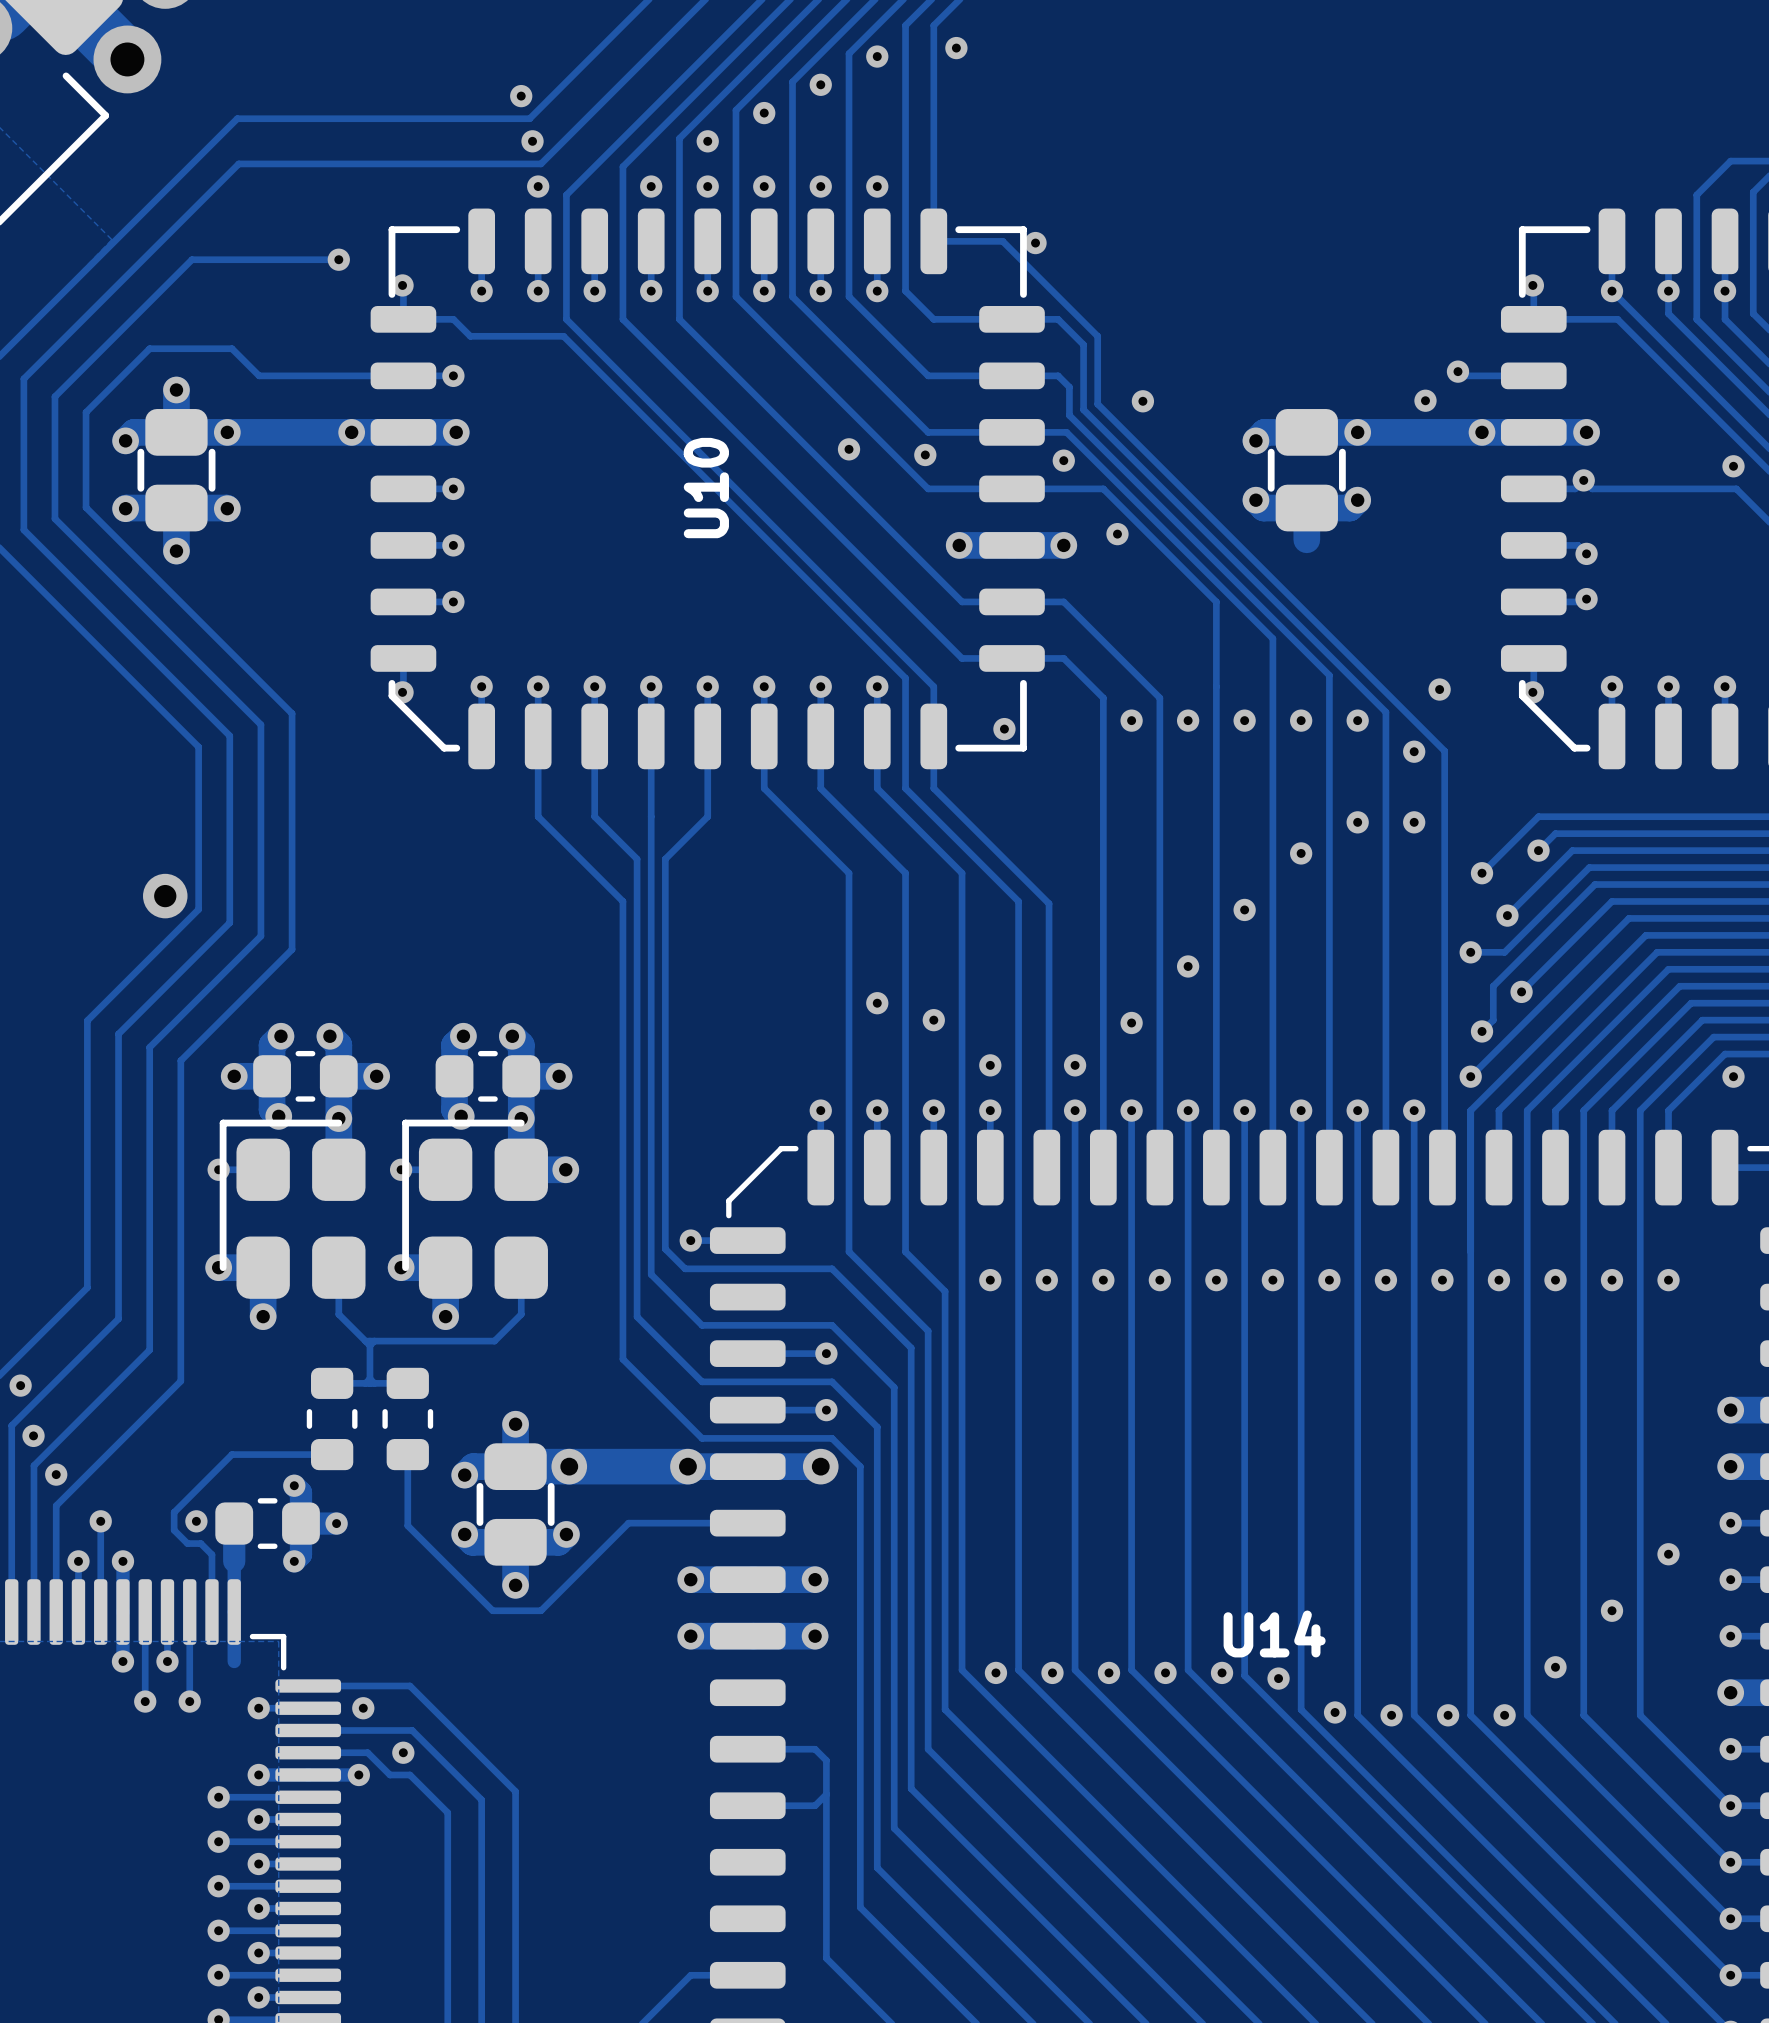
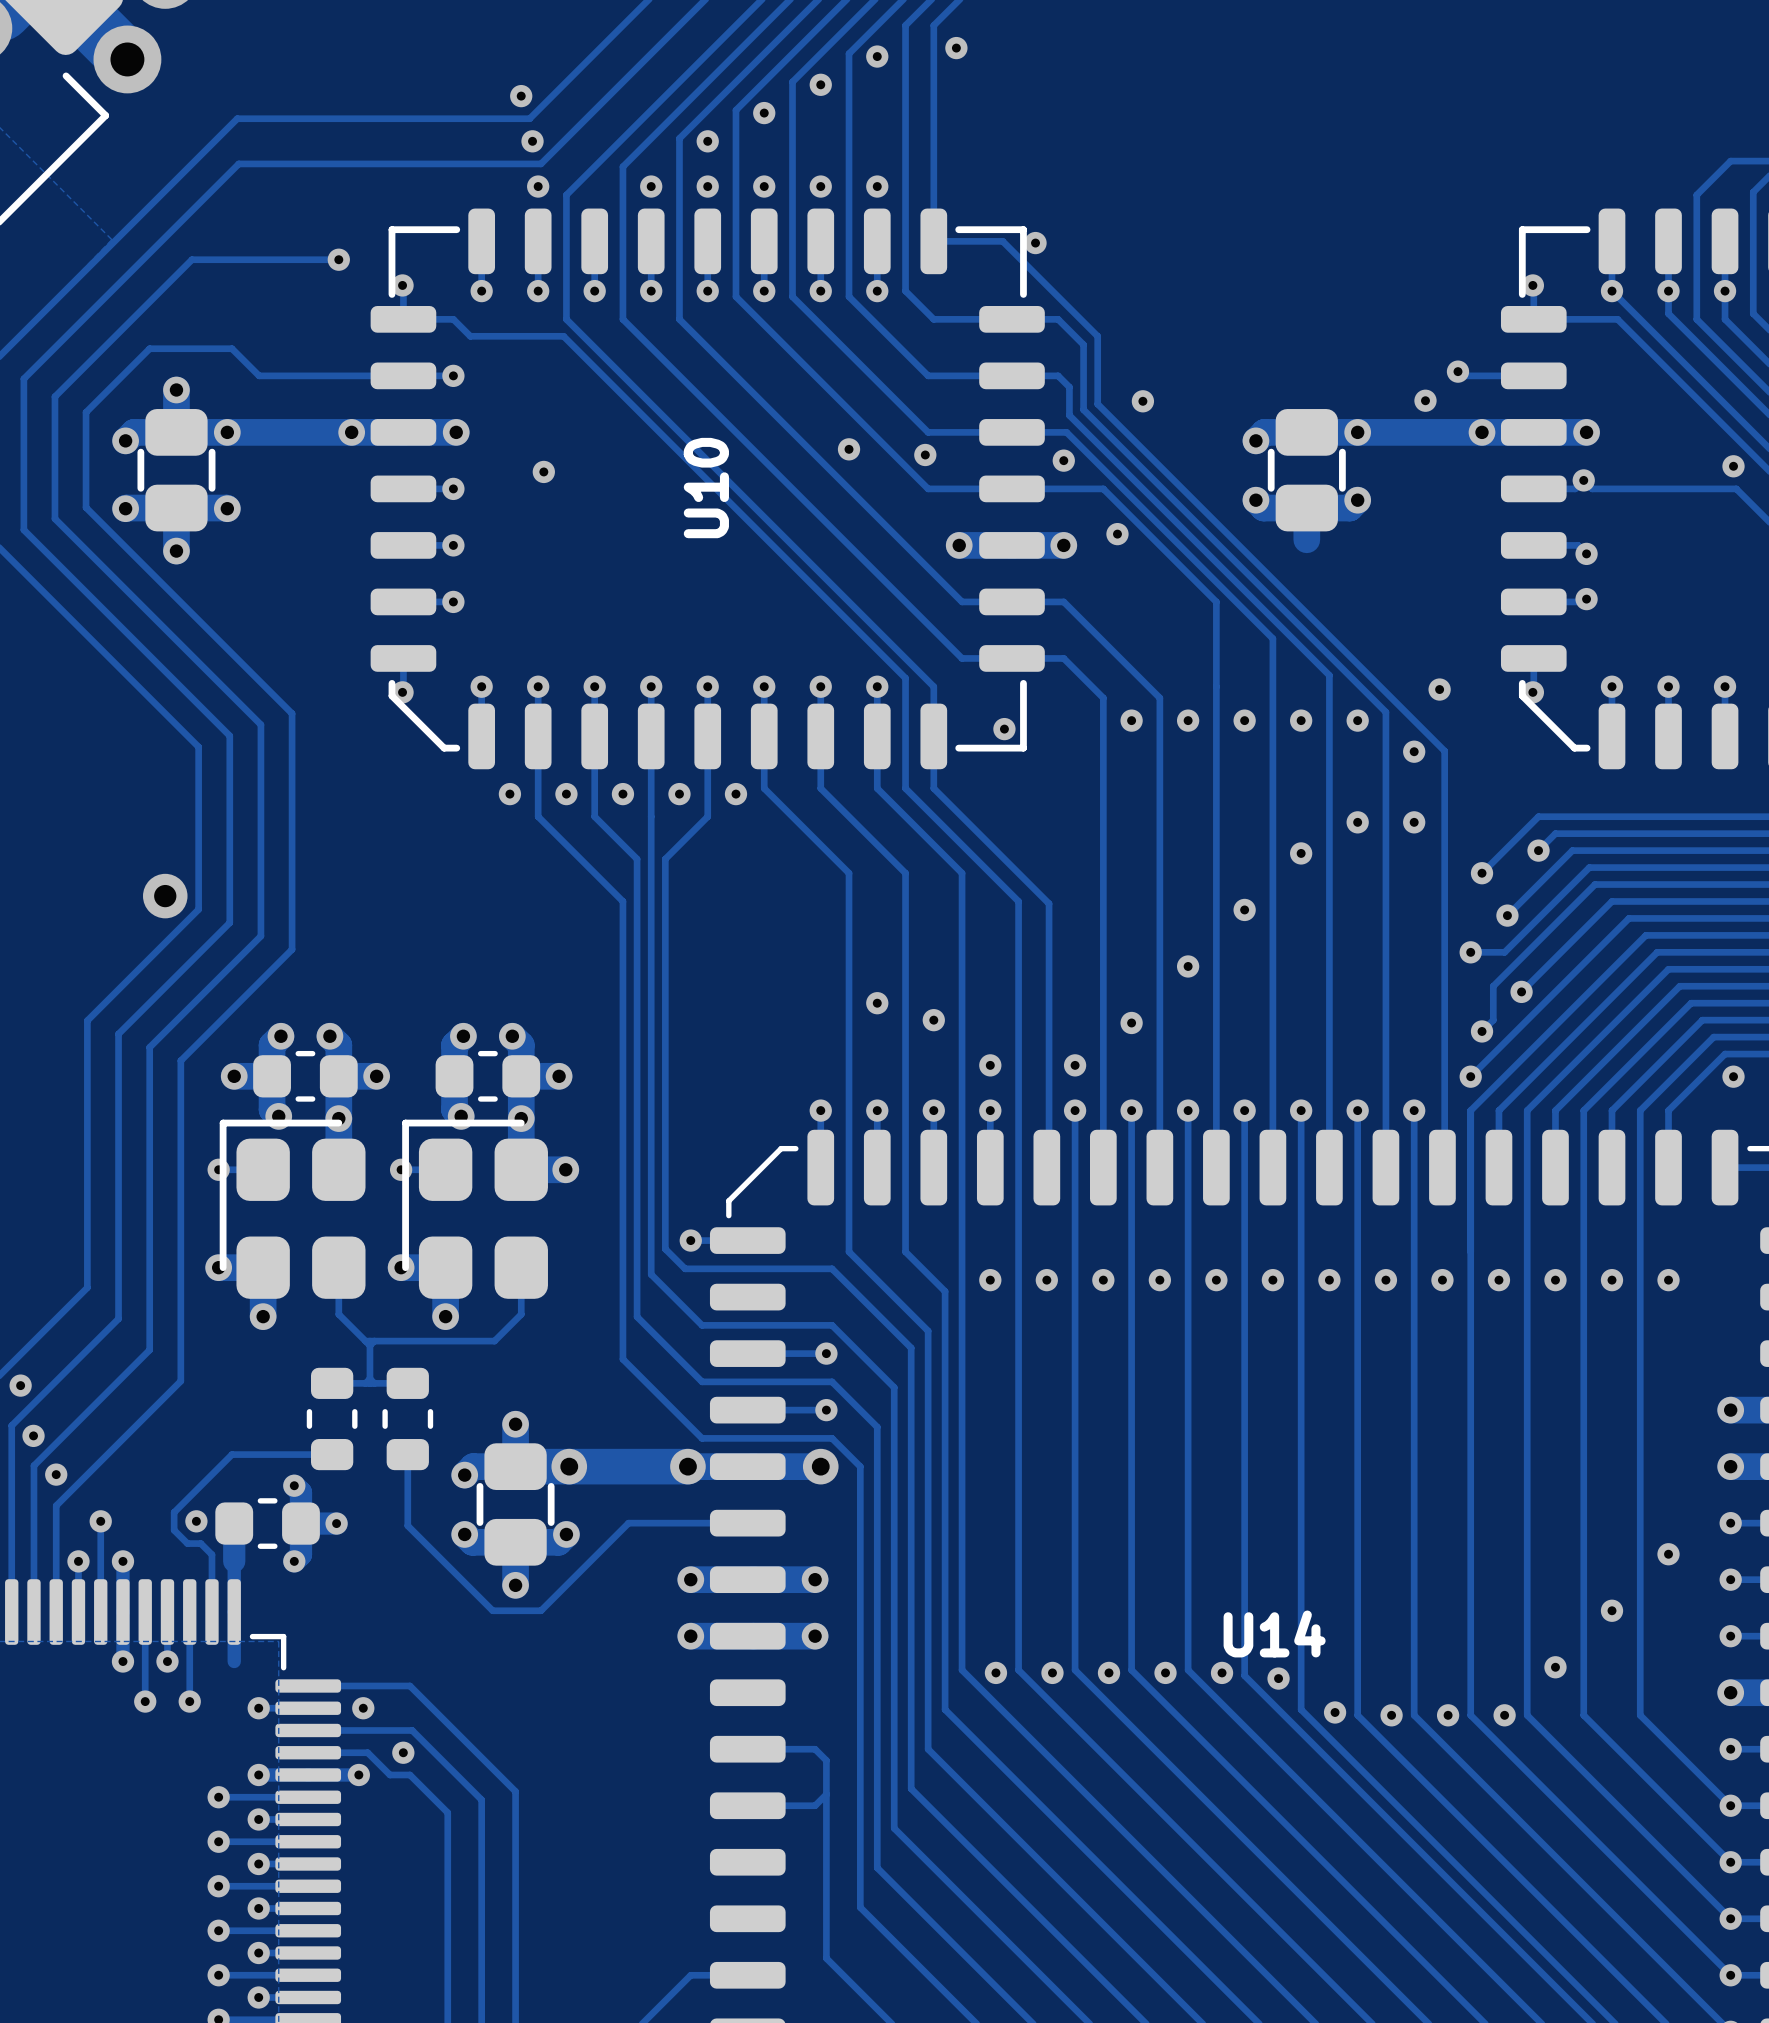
via: none -> (543, 471)
via: none -> (509, 794)
via: none -> (566, 794)
via: none -> (622, 794)
via: none -> (679, 794)
via: none -> (735, 794)

